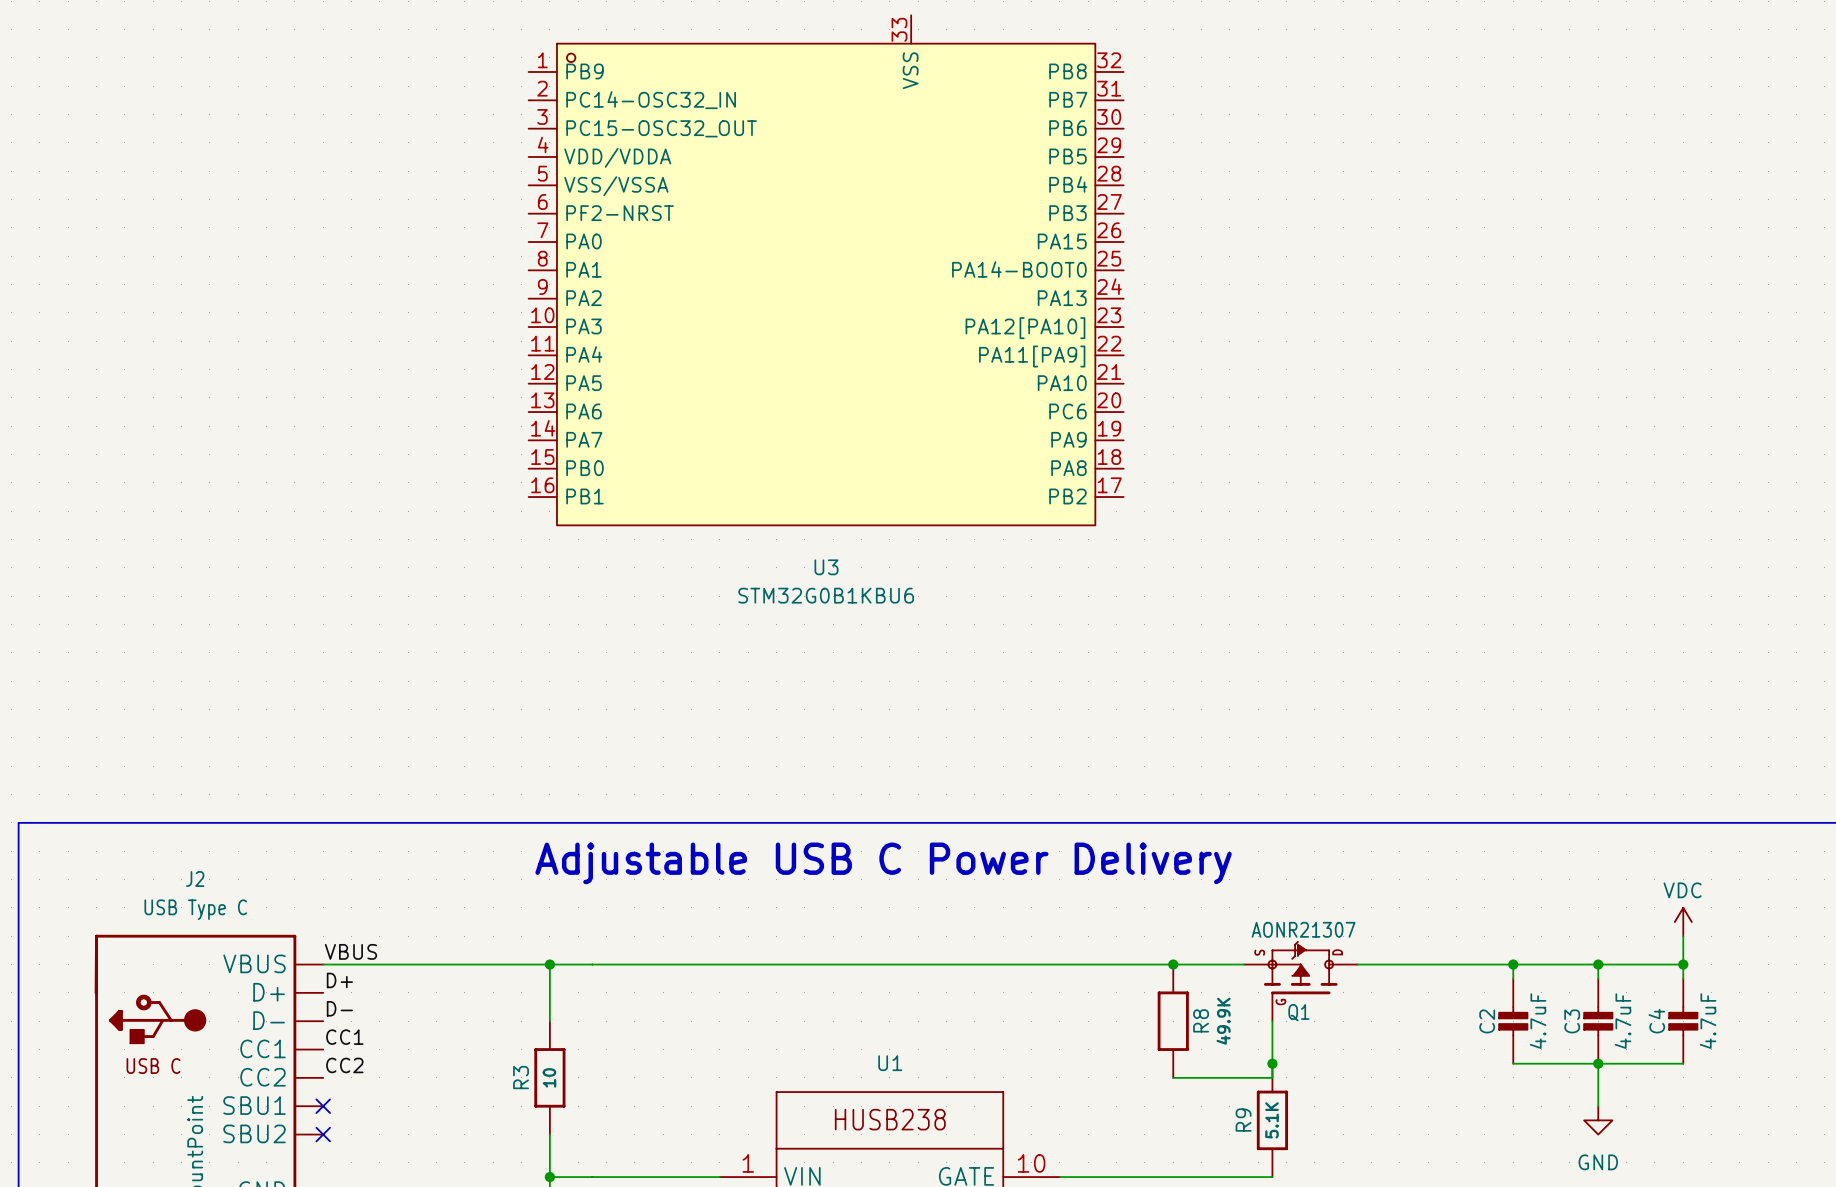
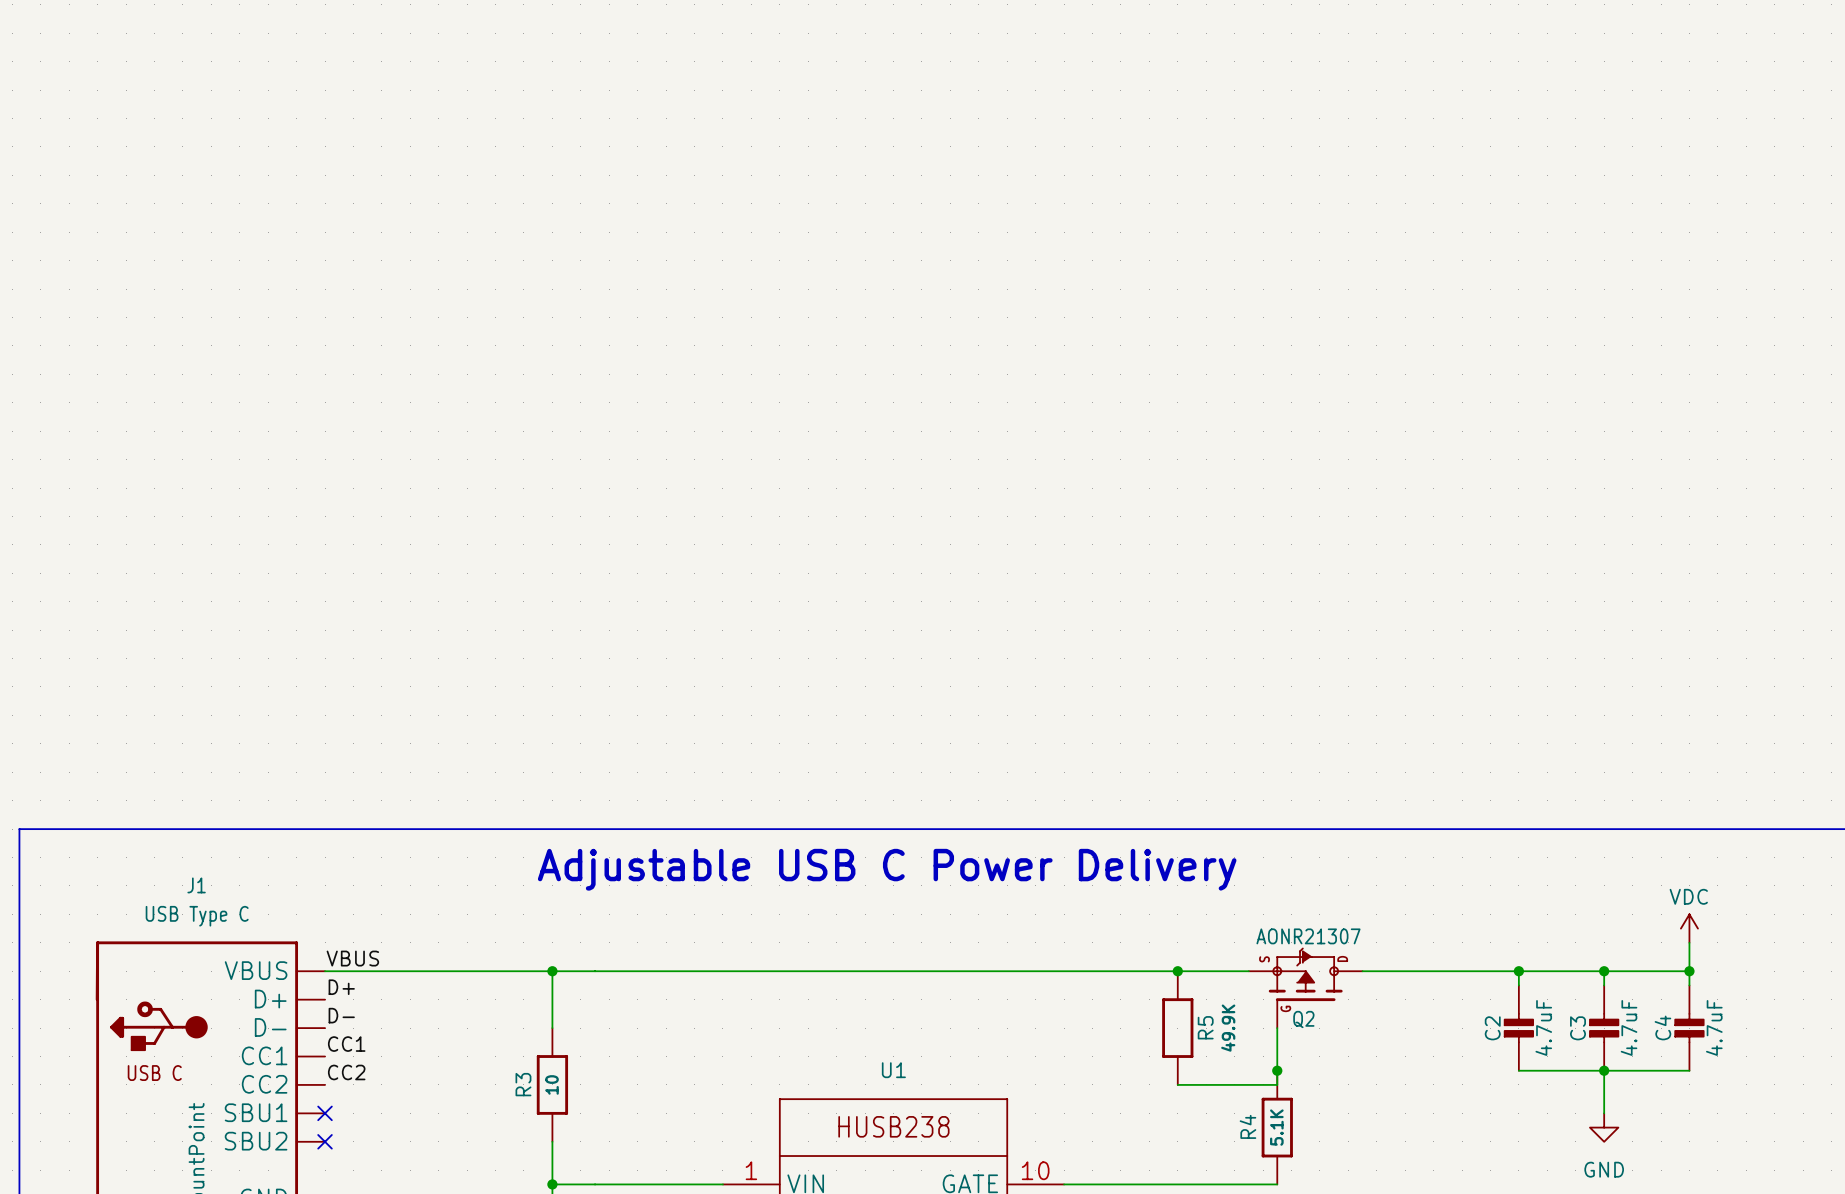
U3: STM32G0B1KBU6 (826, 270) -> none
J2 name: J2 (195, 879) -> J1 (196, 885)
Q1 name: Q1 (1298, 1012) -> Q2 (1303, 1019)
R8 name: R8 (1201, 1020) -> R5 (1205, 1027)
R9 name: R9 (1243, 1120) -> R4 (1247, 1126)

